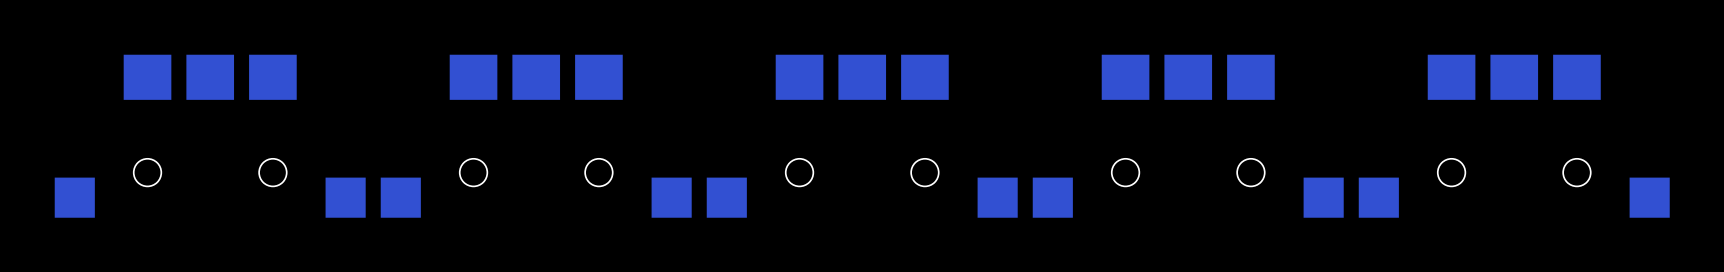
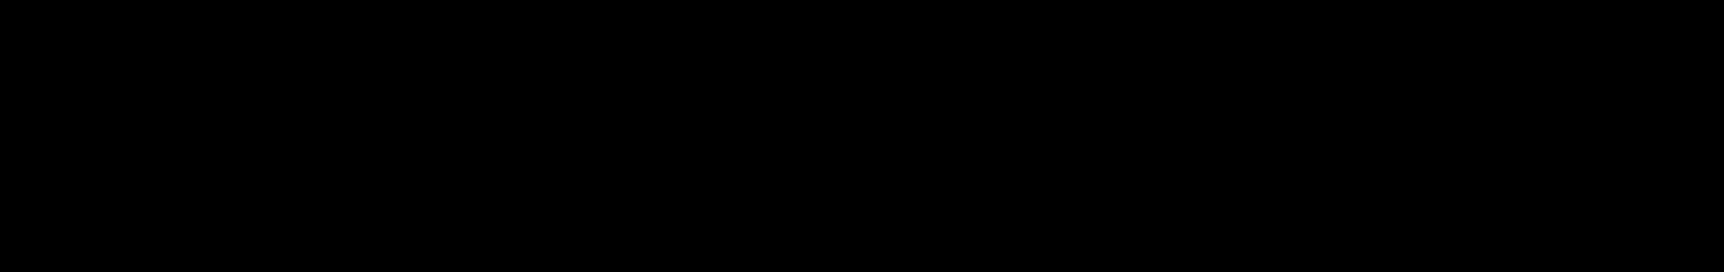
part: (210, 136) -> none
part: (536, 136) -> none
part: (862, 136) -> none
part: (1188, 136) -> none
part: (1514, 136) -> none

